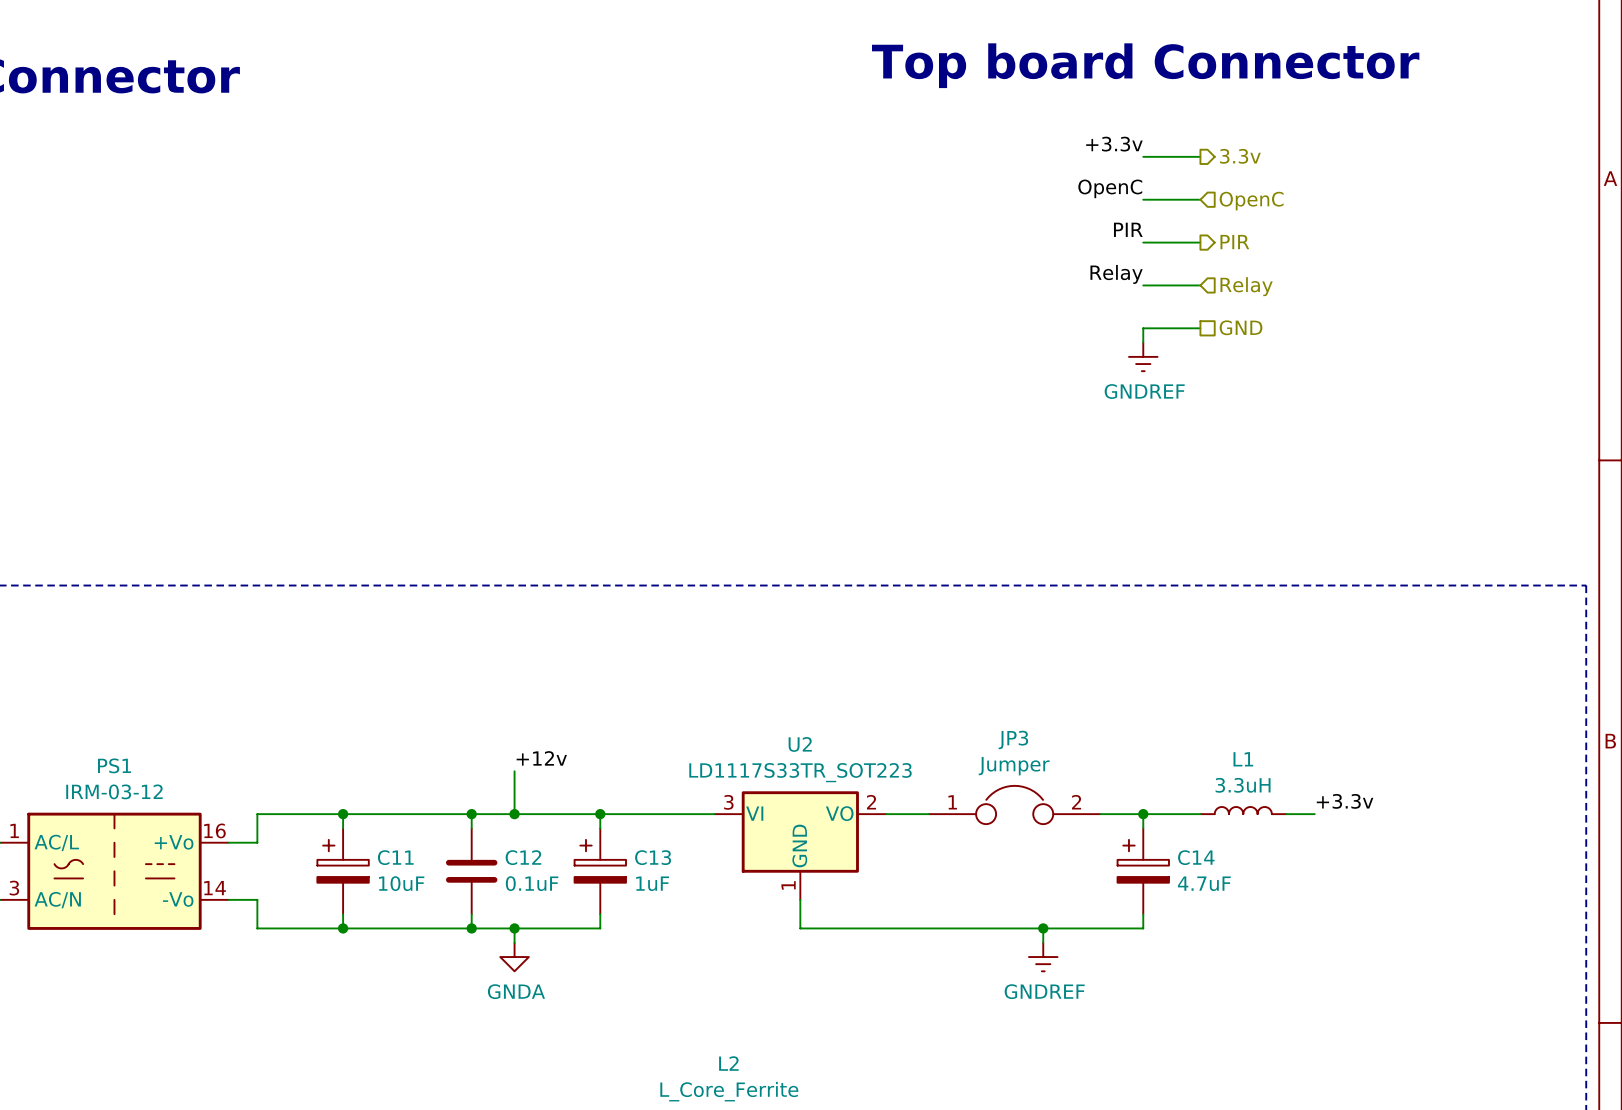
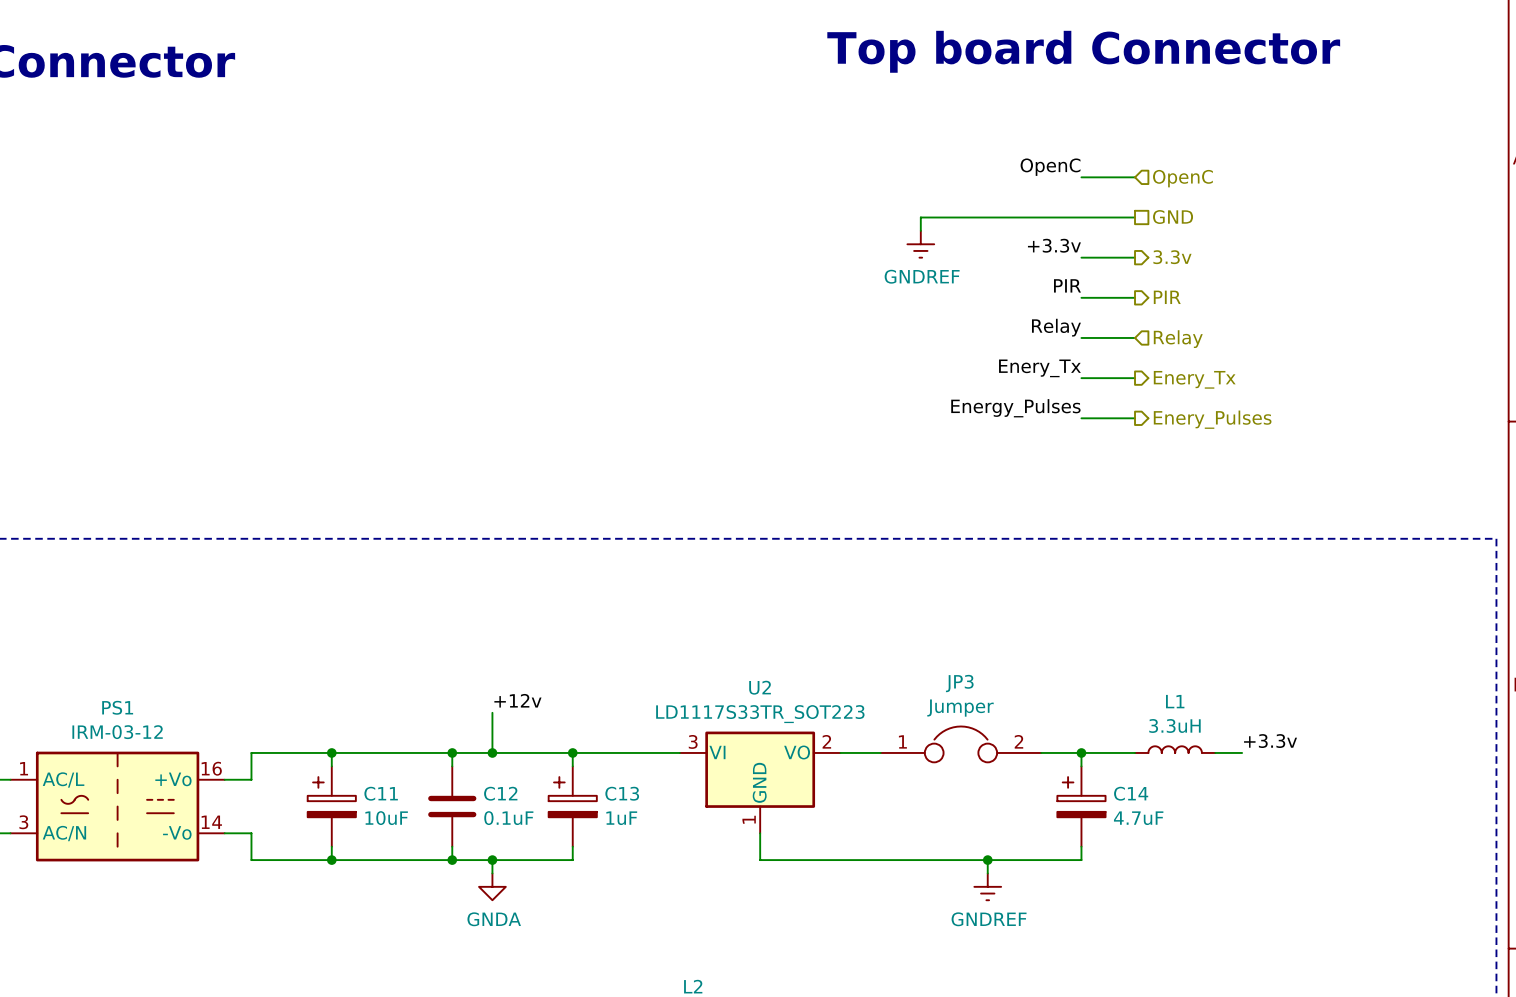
label: +3.3v (1114, 144) -> none
wire: (1143, 156) (1200, 156) -> (1081, 337) (1135, 337)
hierarchical label: 3.3v (1240, 156) -> none
label position: PIR (1128, 229) -> PIR (1067, 285)
wire: none -> (1081, 217) (920, 217) (920, 230)
hierarchical label shape: output (1234, 242) -> passive (1173, 217)
hierarchical label: PIR (1234, 242) -> GND (1173, 217)
label: Relay (1116, 274) -> +3.3v (1054, 245)
hierarchical label shape: input (1246, 286) -> output (1172, 257)
hierarchical label: Relay (1246, 286) -> 3.3v (1172, 257)
hierarchical label shape: passive (1241, 327) -> output (1167, 297)
hierarchical label: GND (1241, 327) -> PIR (1167, 297)
wire: (1143, 328) (1143, 342) -> none
power symbol position: GNDREF (1143, 356) -> GNDREF (920, 244)
label: none -> Relay (1056, 327)
hierarchical label: none -> Relay (1178, 339)
label: none -> Enery_Tx (1039, 368)
wire: none -> (1081, 378) (1135, 378)
hierarchical label: none -> Enery_Tx (1194, 379)
label: none -> Energy_Pulses (1015, 408)
wire: none -> (1081, 418) (1135, 418)
hierarchical label: none -> Enery_Pulses (1212, 419)

